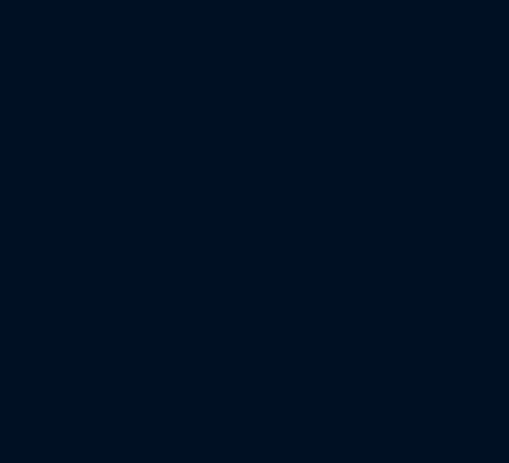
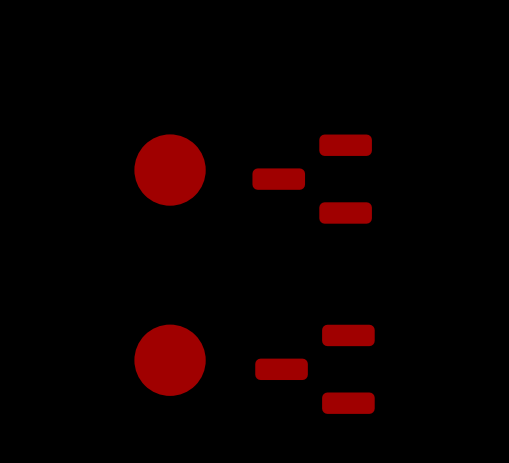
part: none -> (170, 170)
part: none -> (312, 179)
part: none -> (170, 360)
part: none -> (314, 369)

